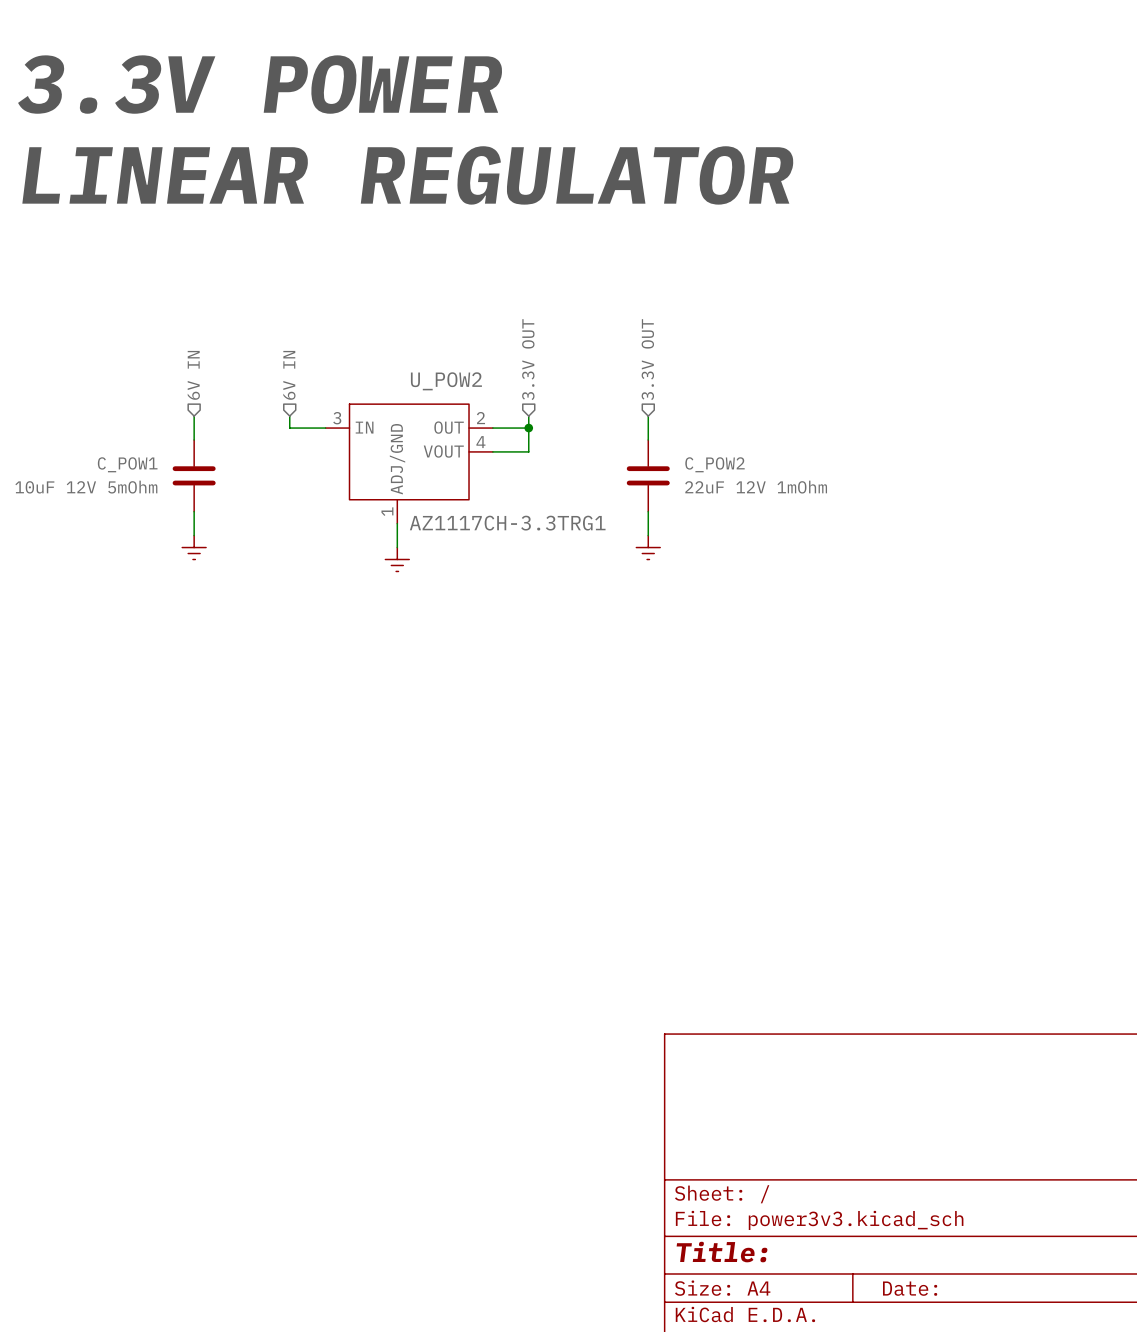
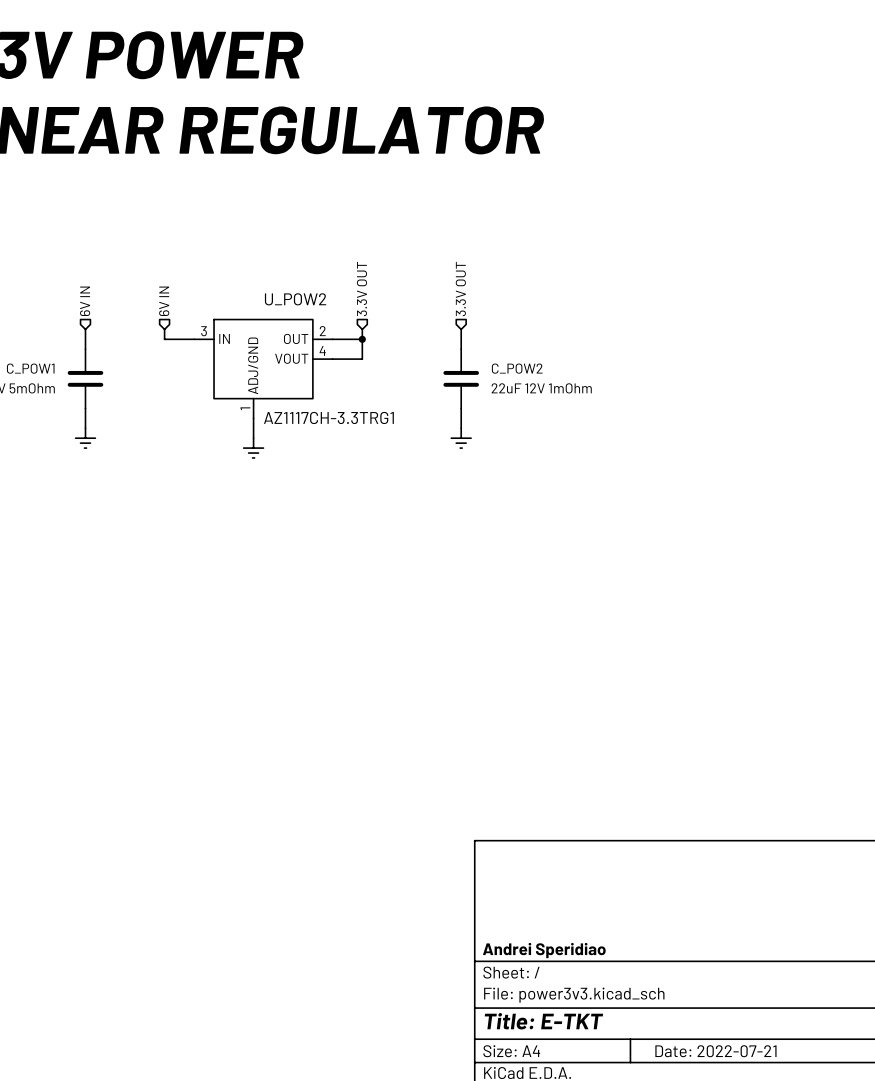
title block: none -> Andrei Speridiao (544, 950)
title block: Title: (722, 1252) -> Title: E-TKT (543, 1021)
title block: Date: (910, 1288) -> Date: 2022-07-21 (715, 1051)

